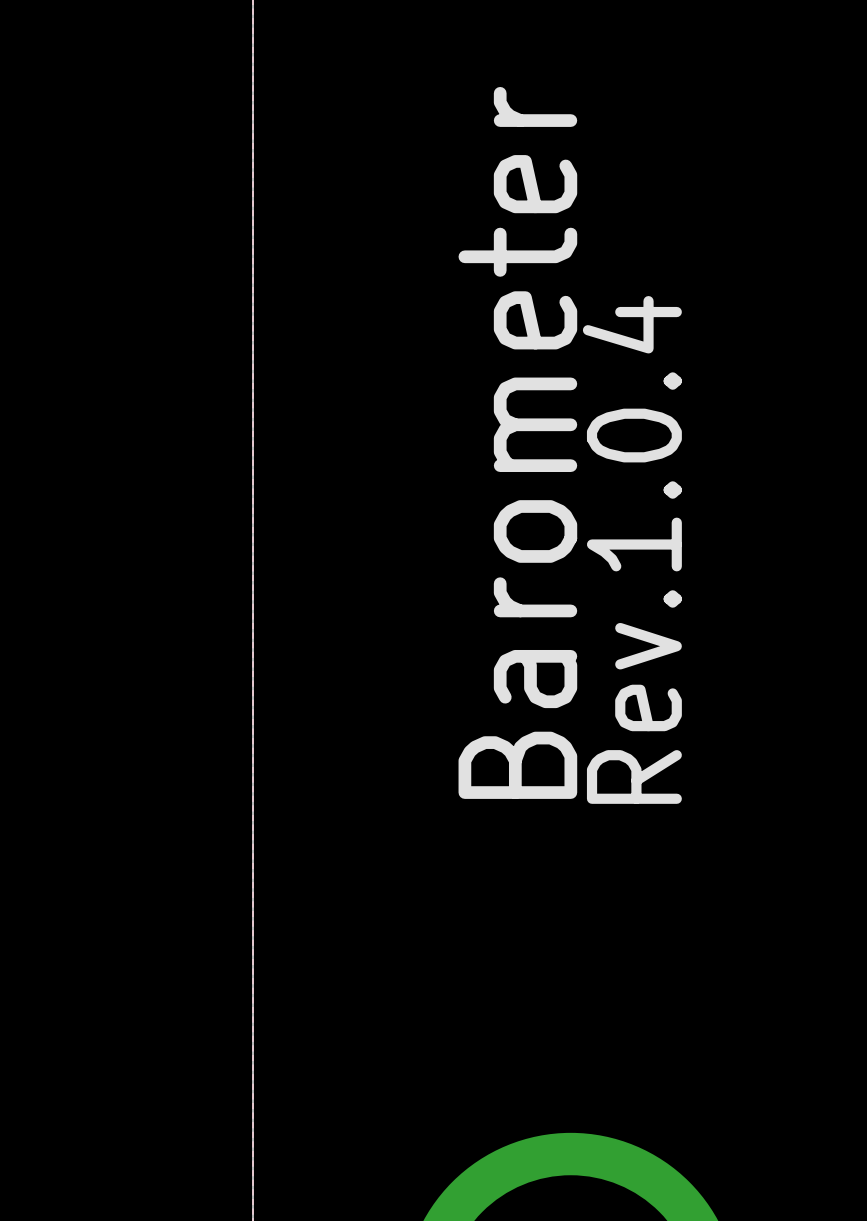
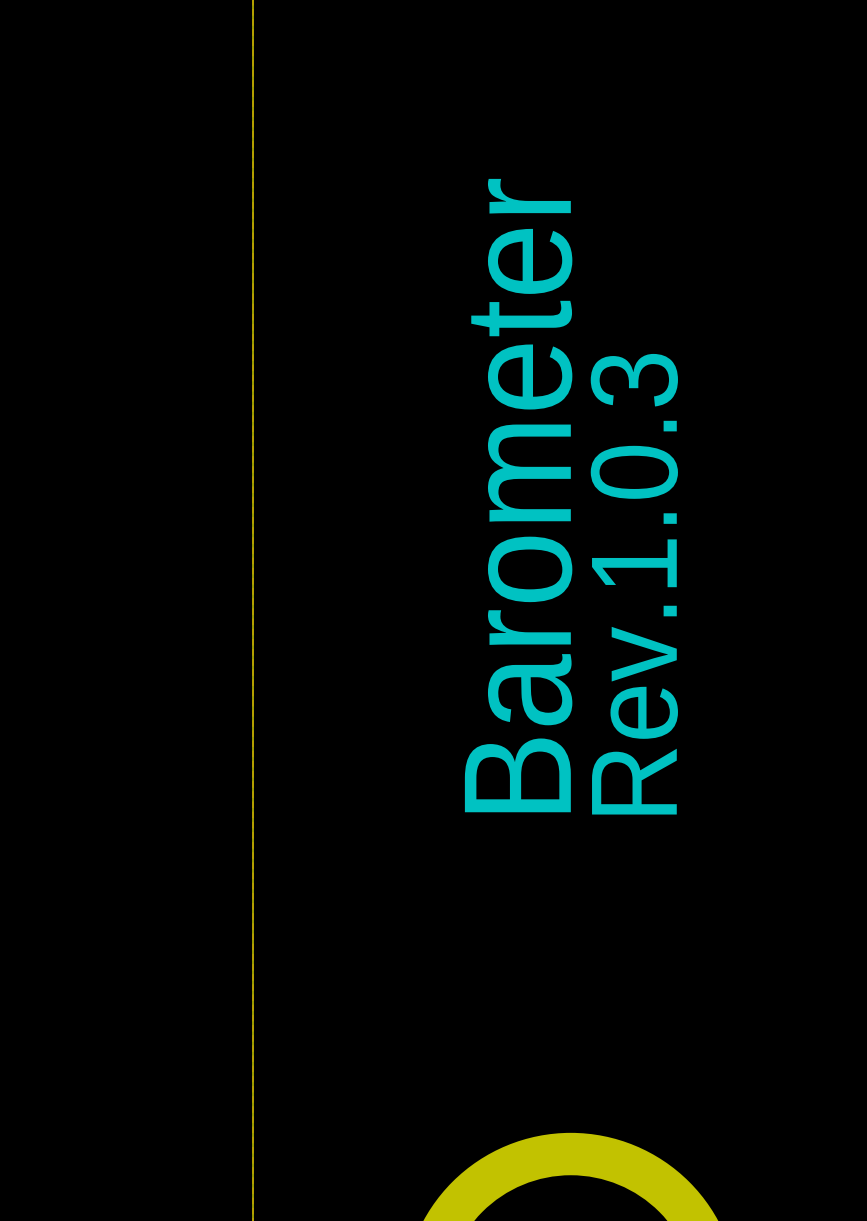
text: Rev.1.0.4 (632, 549) -> Rev.1.0.3 (634, 584)

